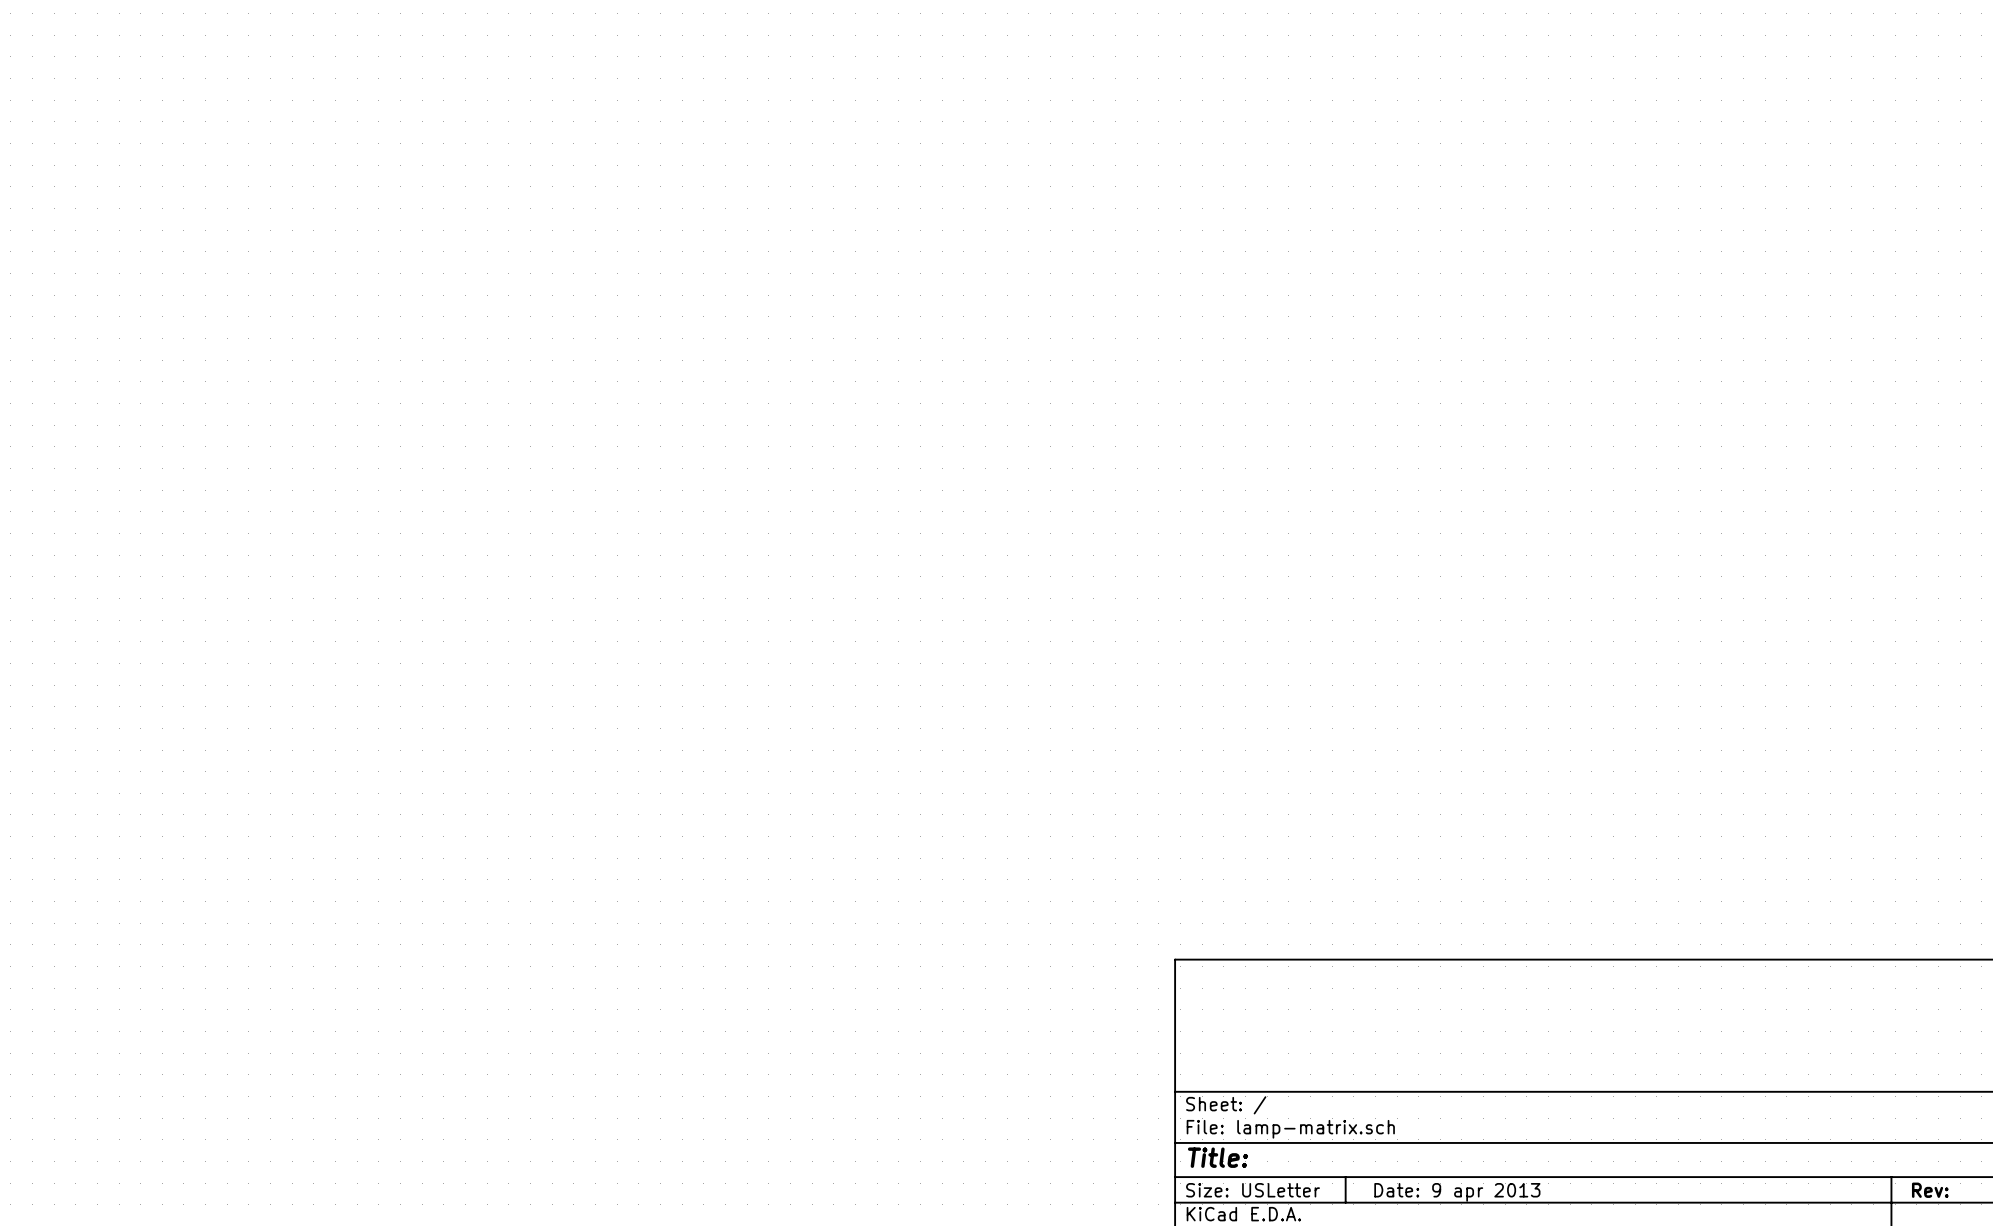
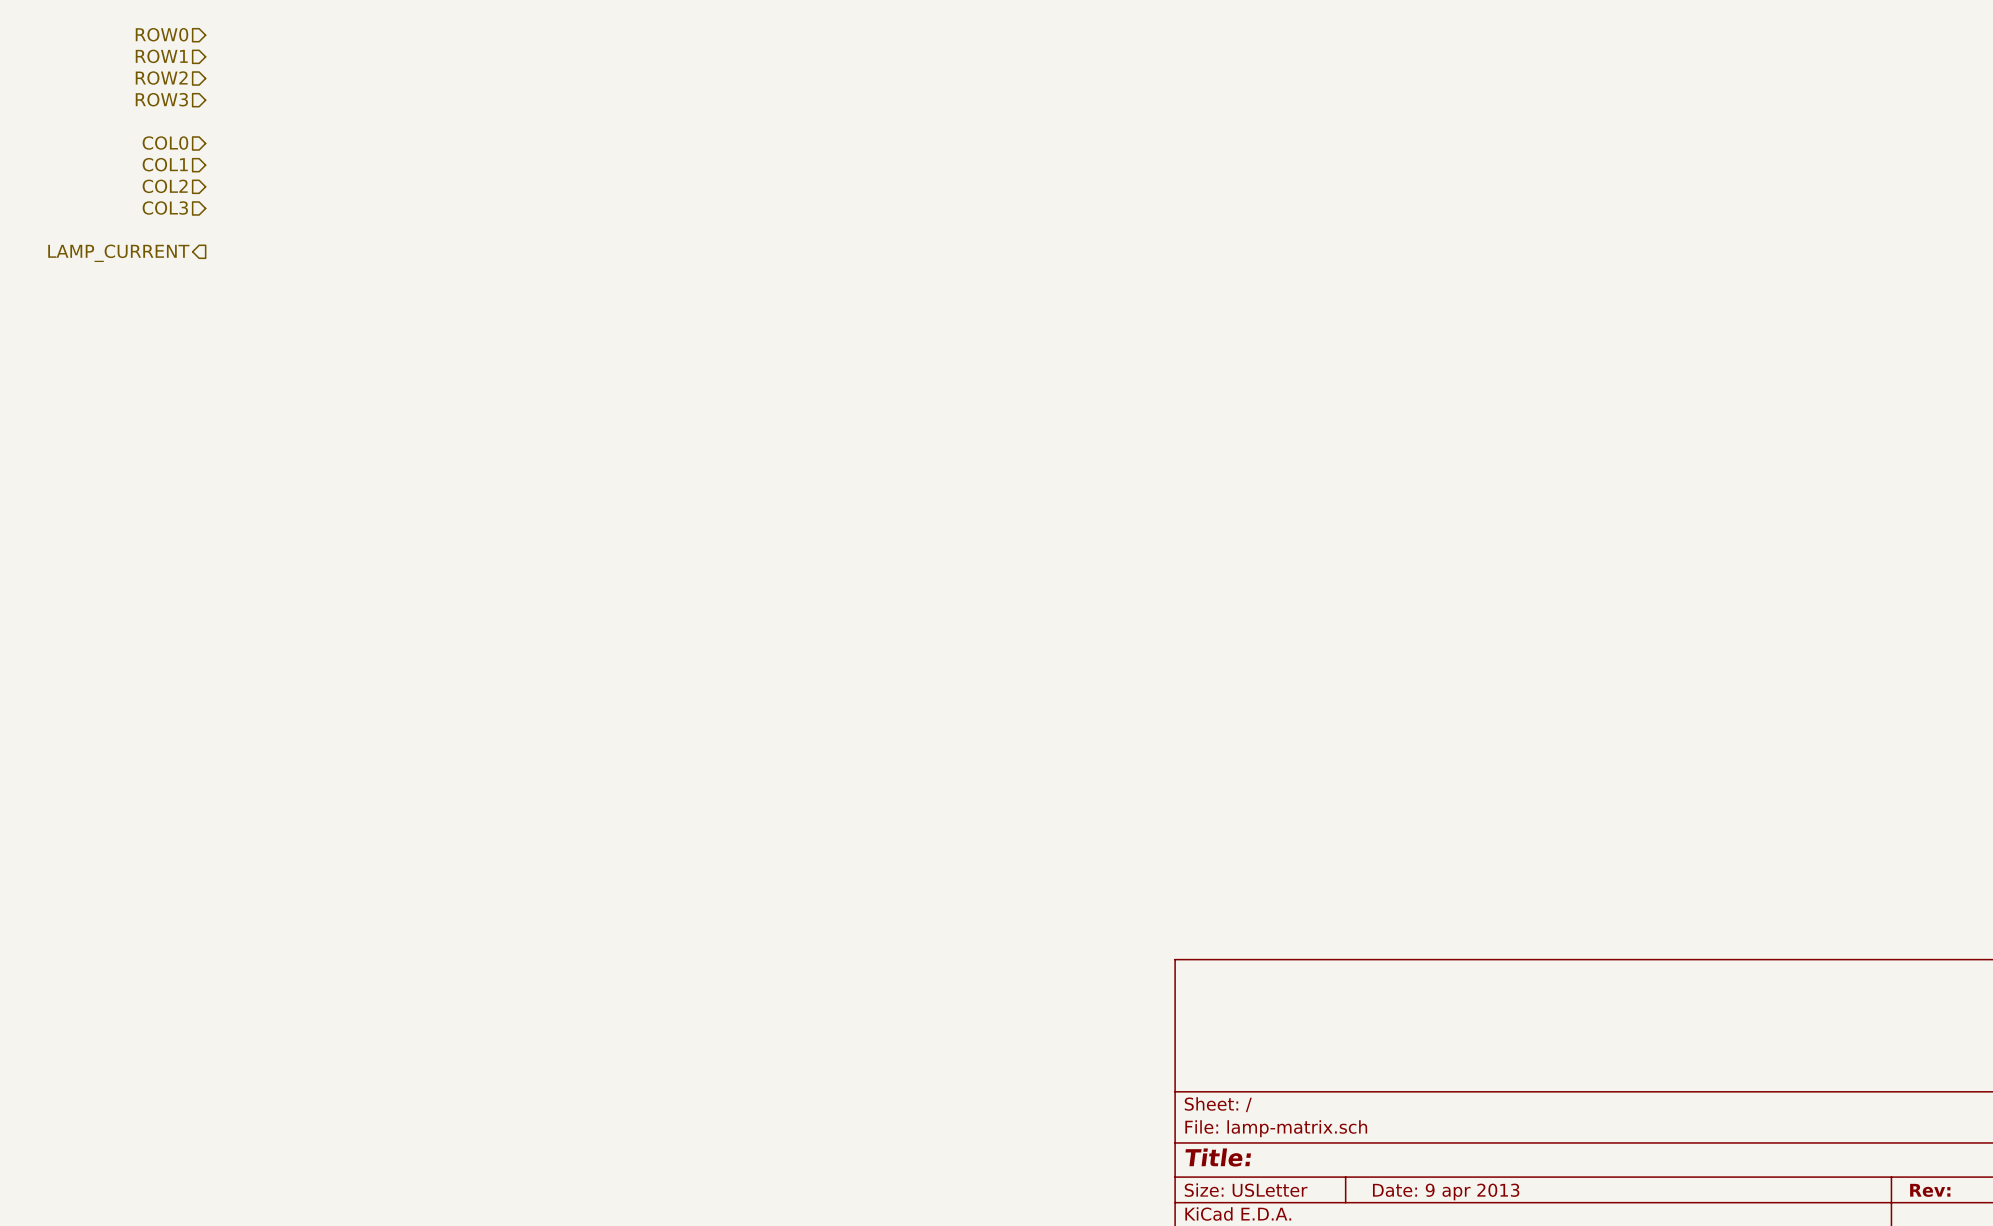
hierarchical label: none -> ROW0 (161, 34)
hierarchical label: none -> ROW1 (161, 56)
hierarchical label: none -> ROW2 (161, 78)
hierarchical label: none -> ROW3 (161, 99)
hierarchical label: none -> COL0 (165, 143)
hierarchical label: none -> COL1 (165, 164)
hierarchical label: none -> COL2 (165, 186)
hierarchical label: none -> COL3 (165, 208)
hierarchical label: none -> LAMP_CURRENT (118, 253)

